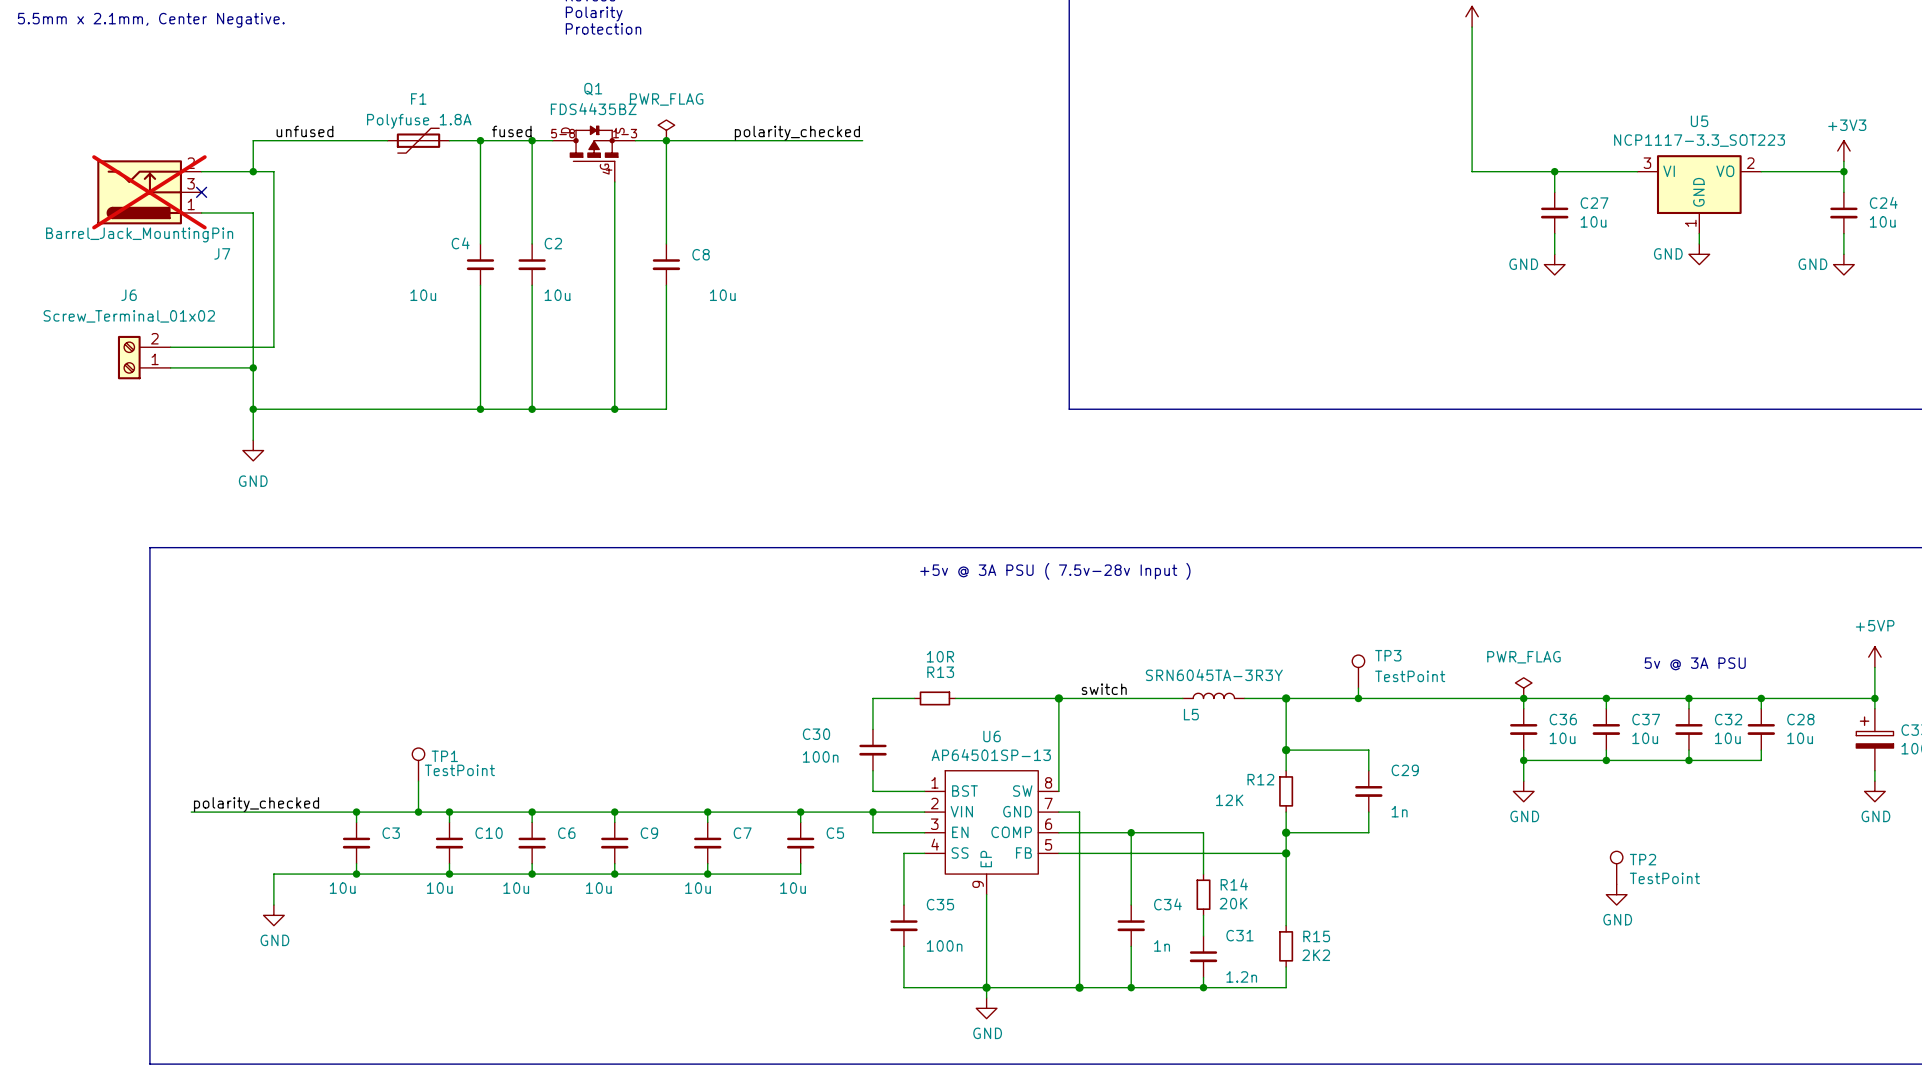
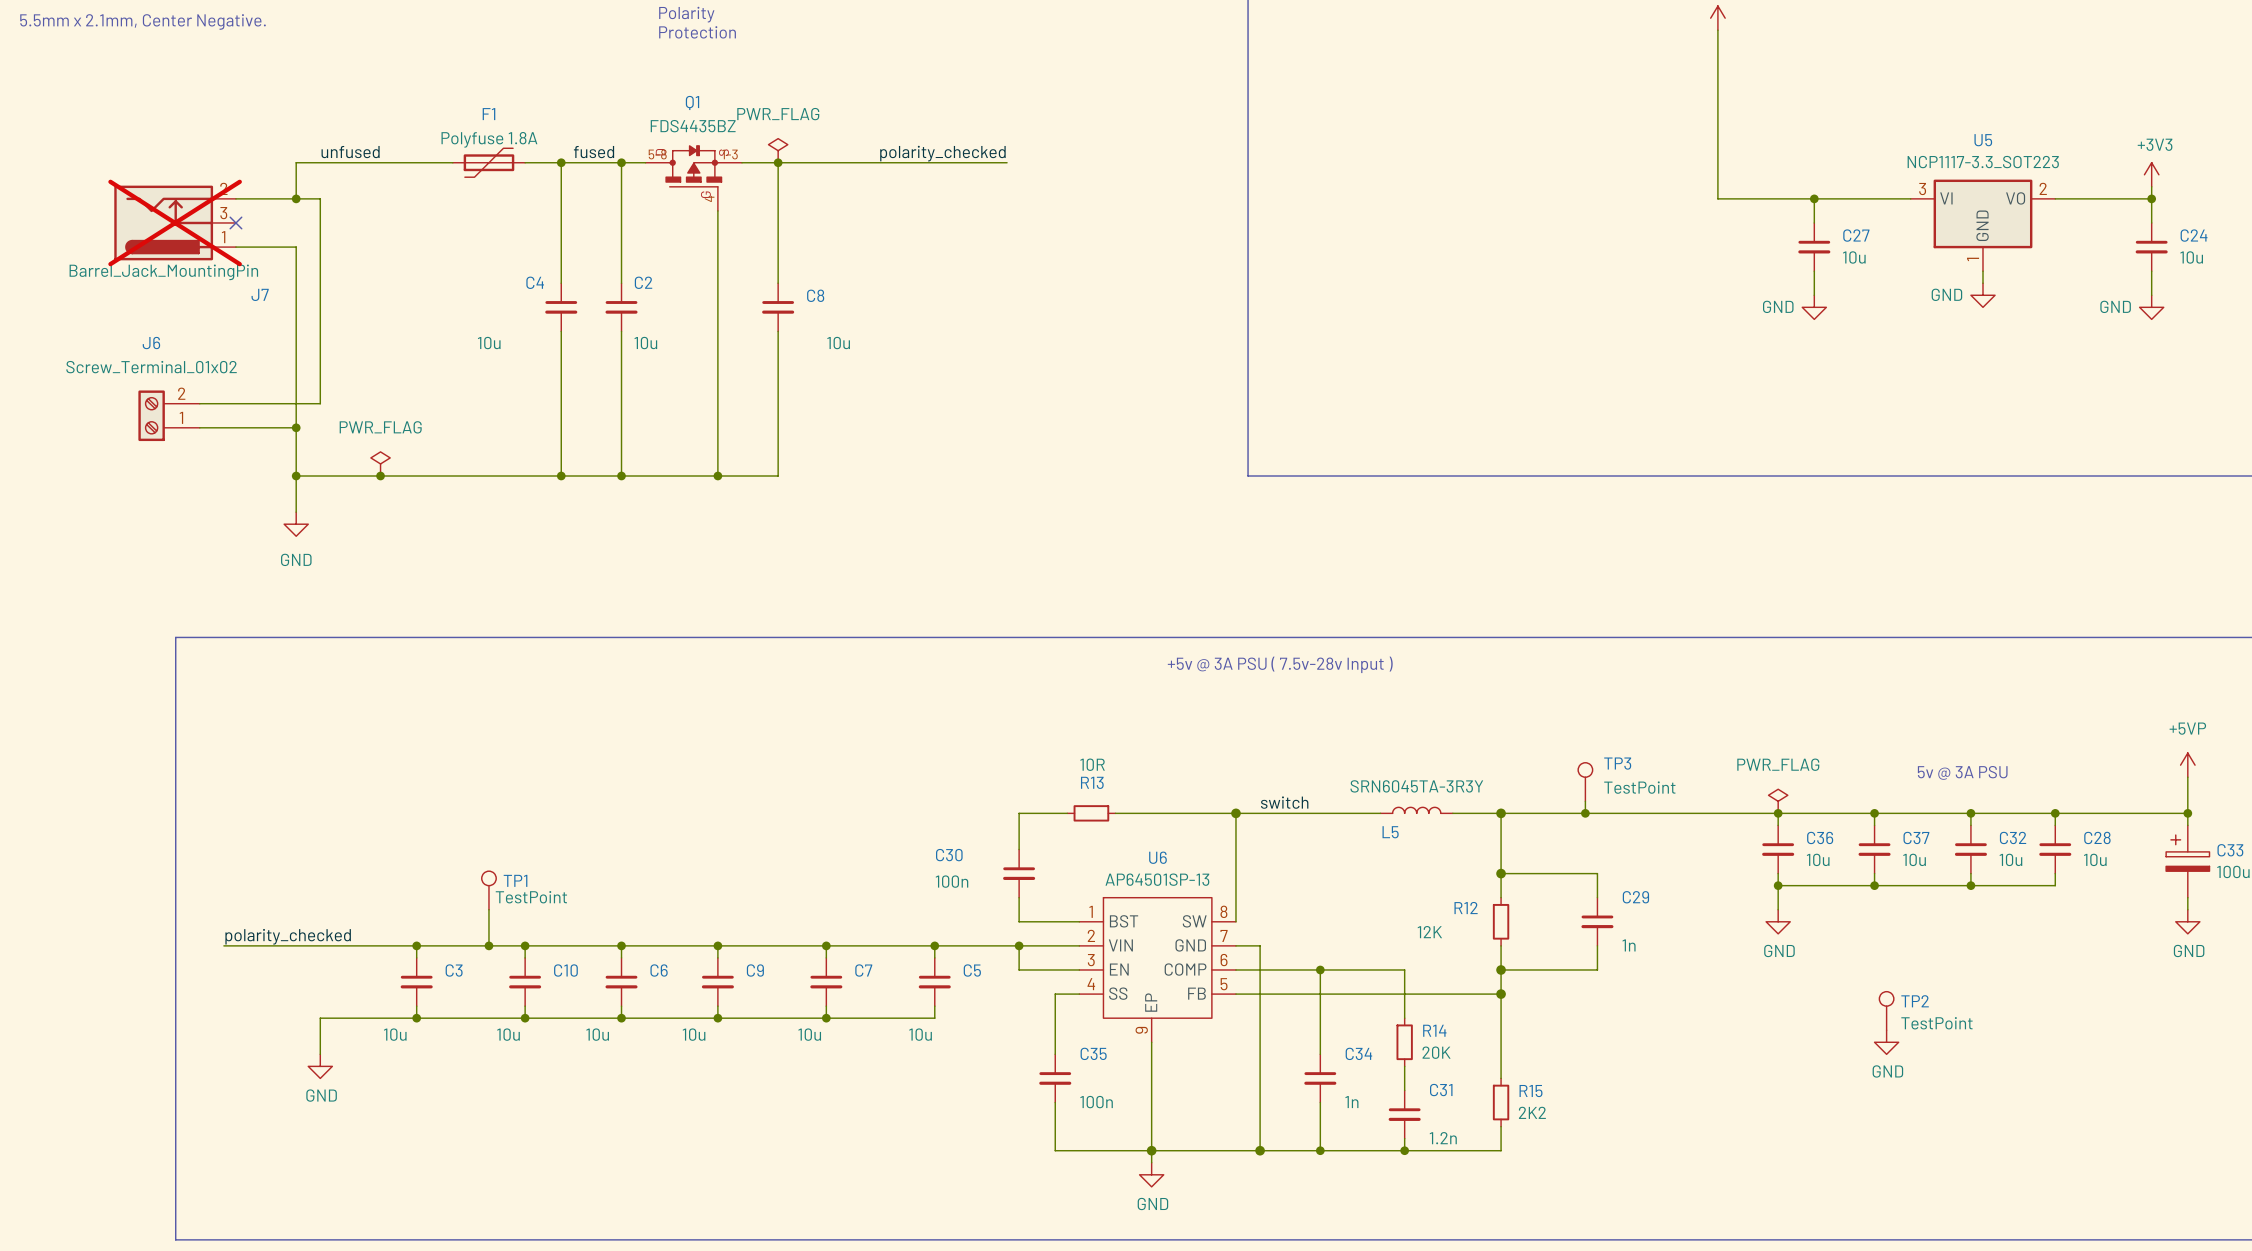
power symbol: none -> PWR_FLAG (380, 463)
junction: none -> (380, 476)

